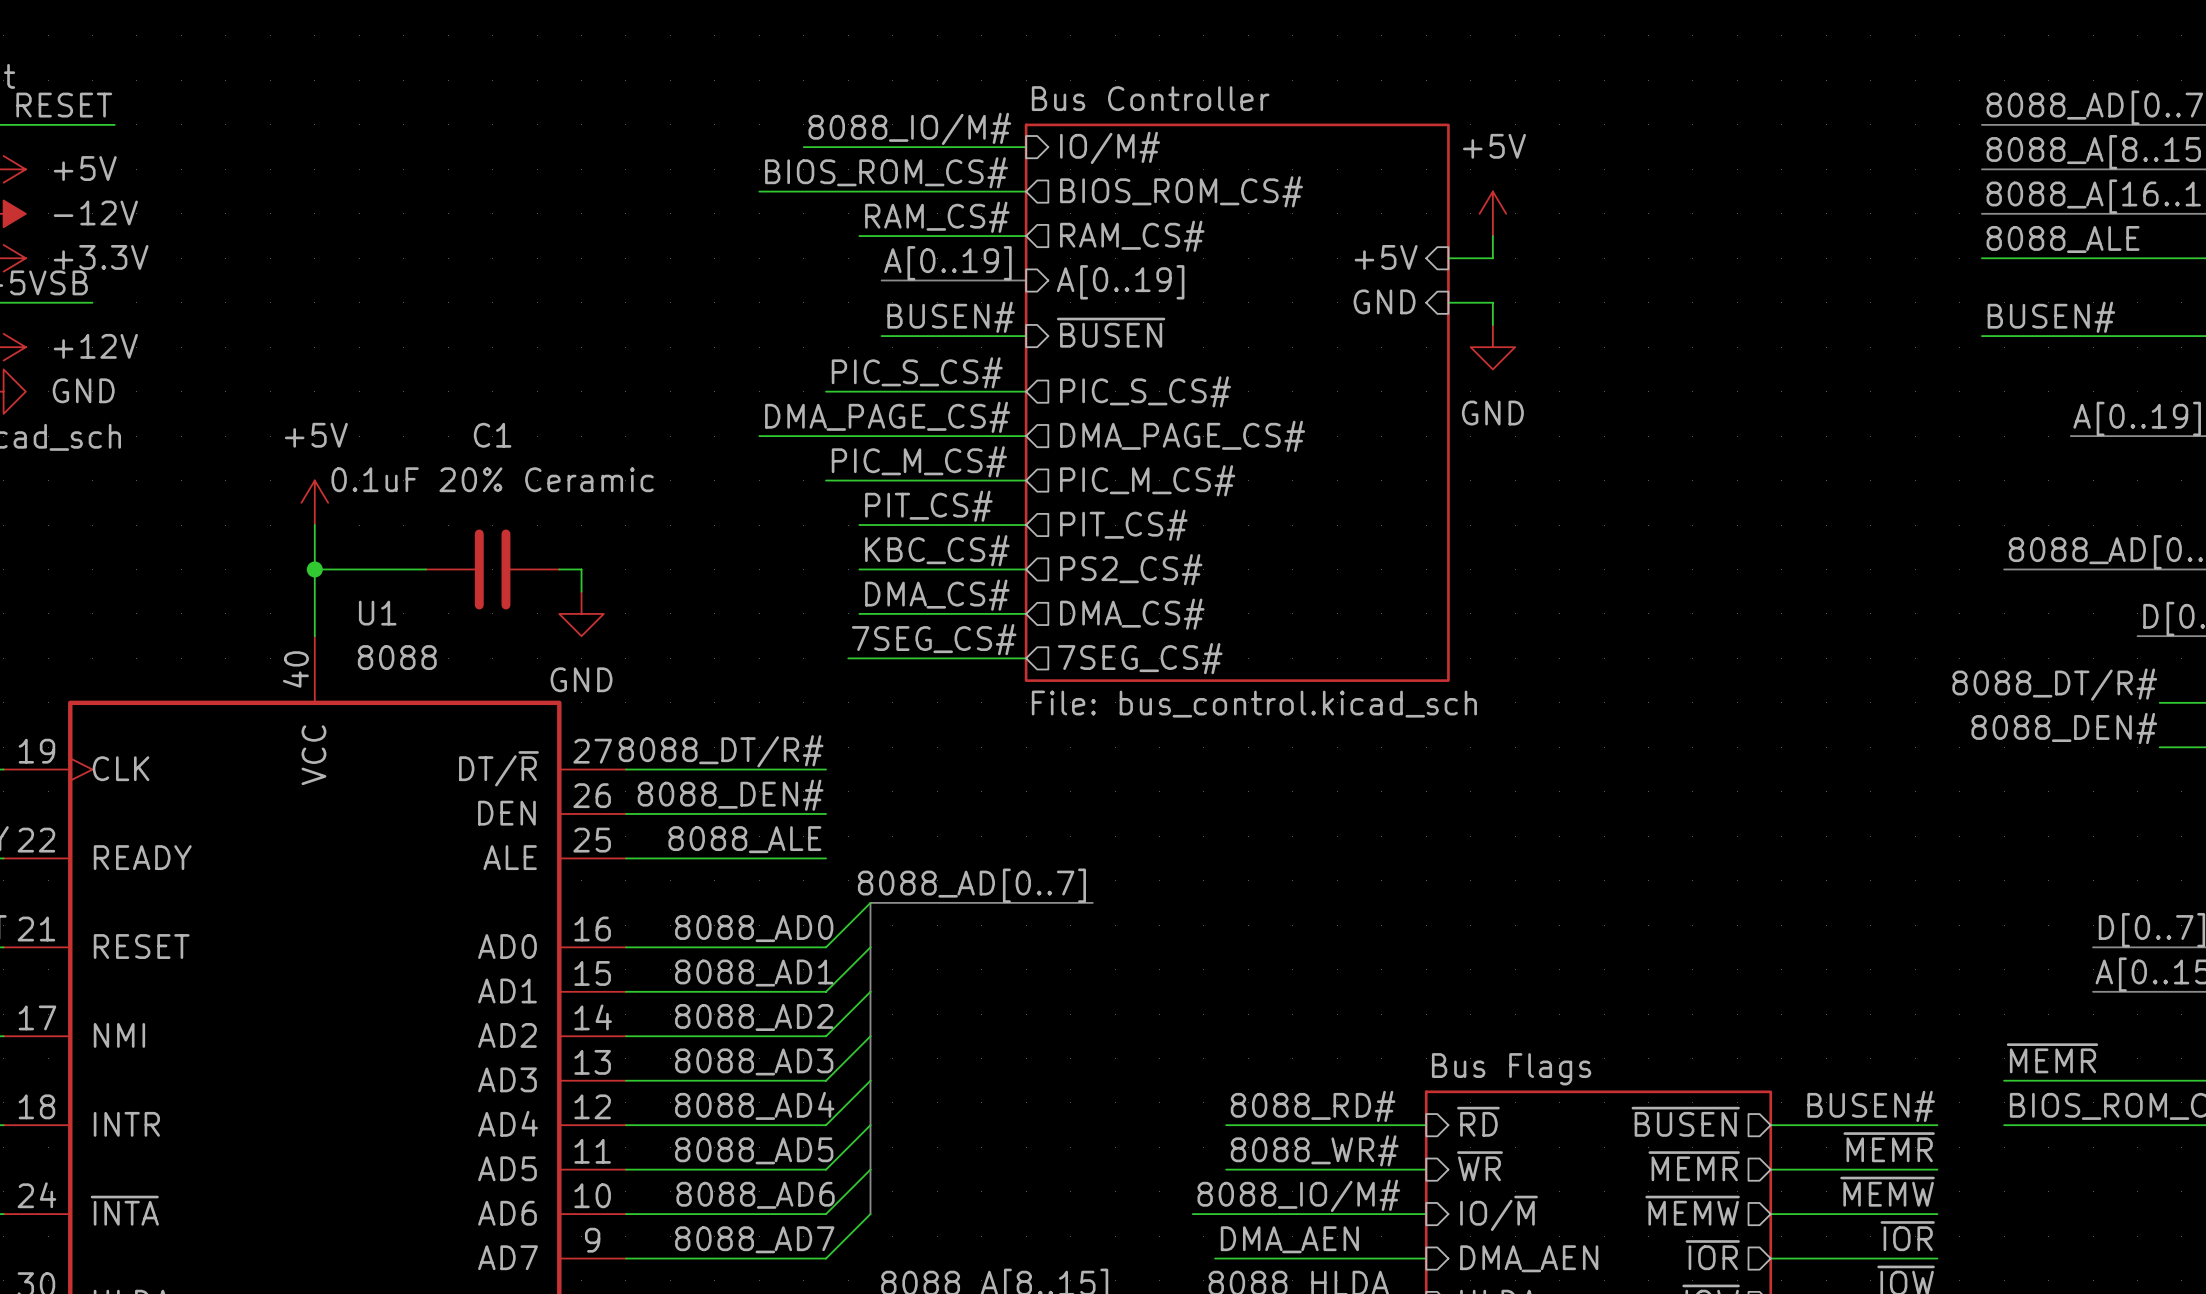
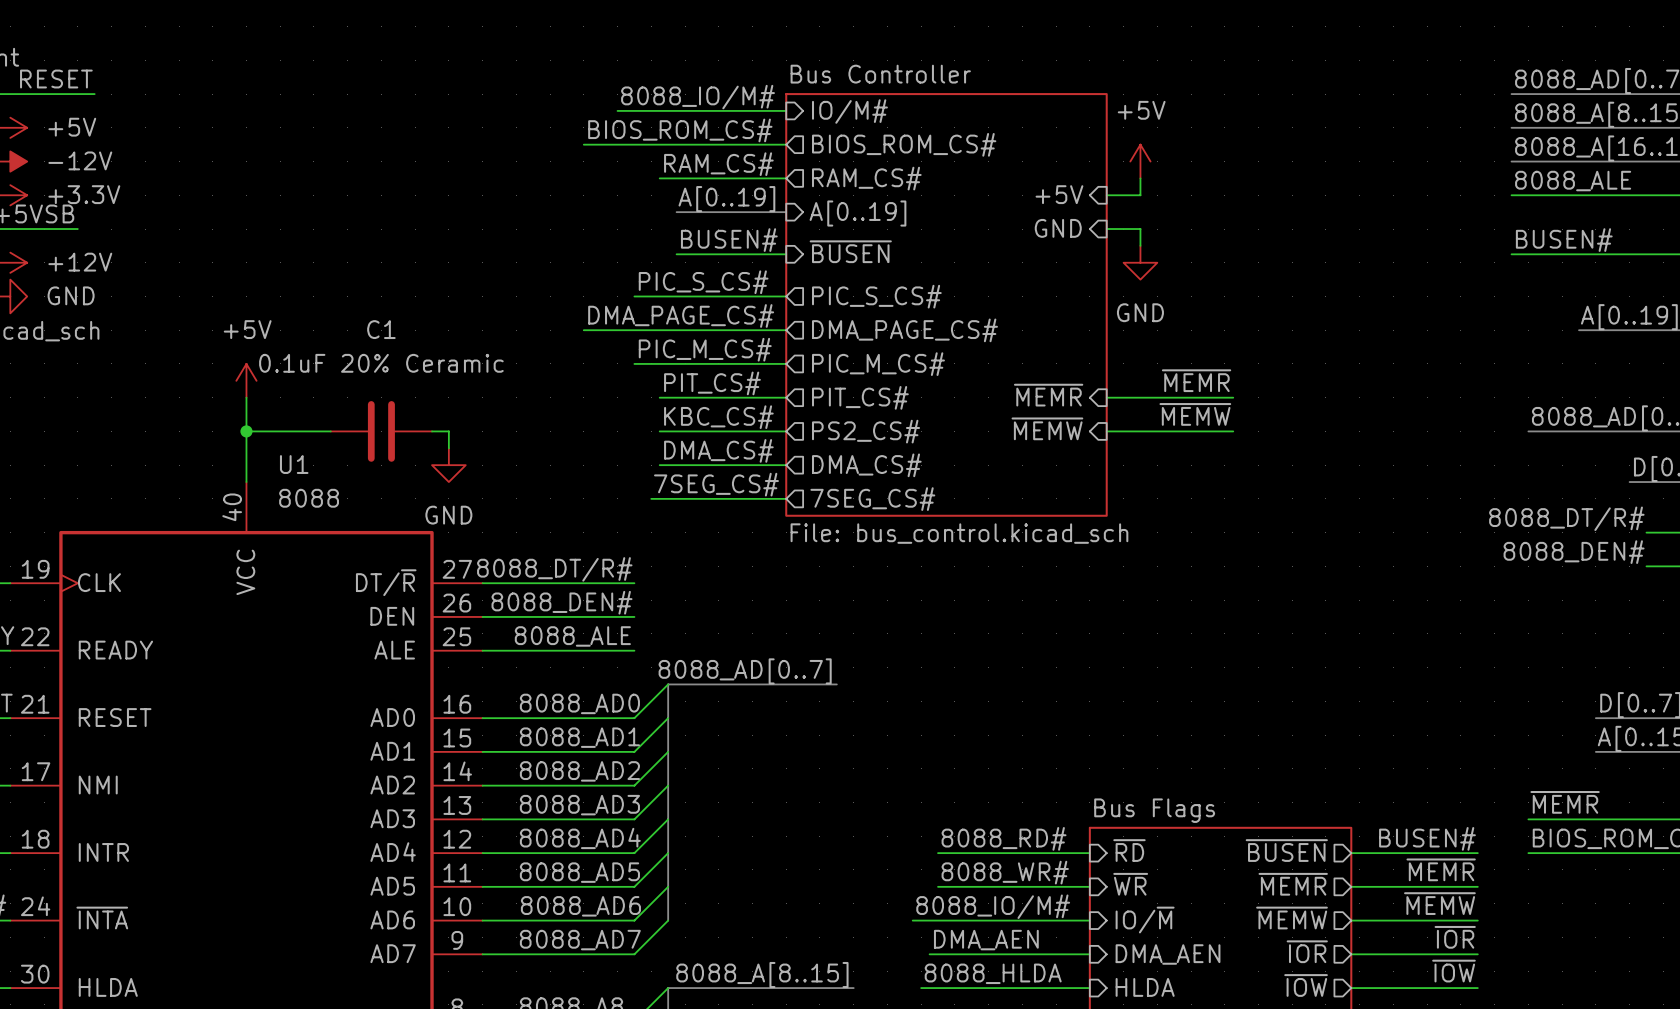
label: none -> ~{MEMR} (1196, 380)
sheet pin: none -> ~{MEMR} (1048, 395)
wire: none -> (1106, 397) (1233, 397)
label: none -> ~{MEMW} (1195, 414)
sheet pin: none -> ~{MEMW} (1047, 428)
wire: none -> (1106, 431) (1233, 431)

